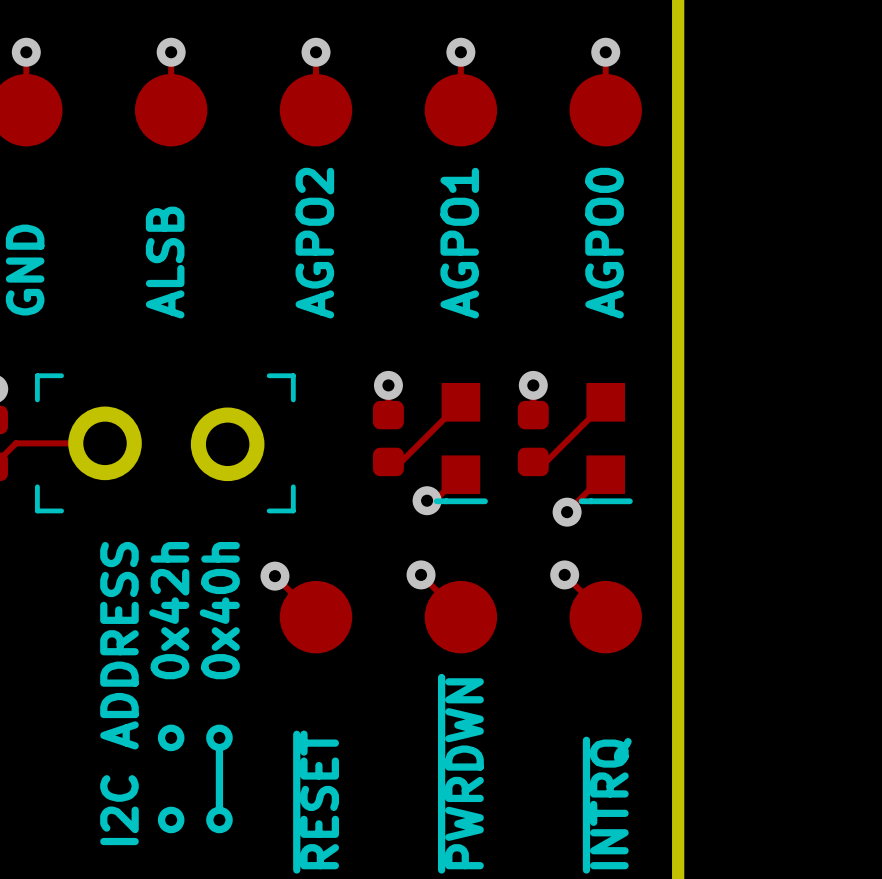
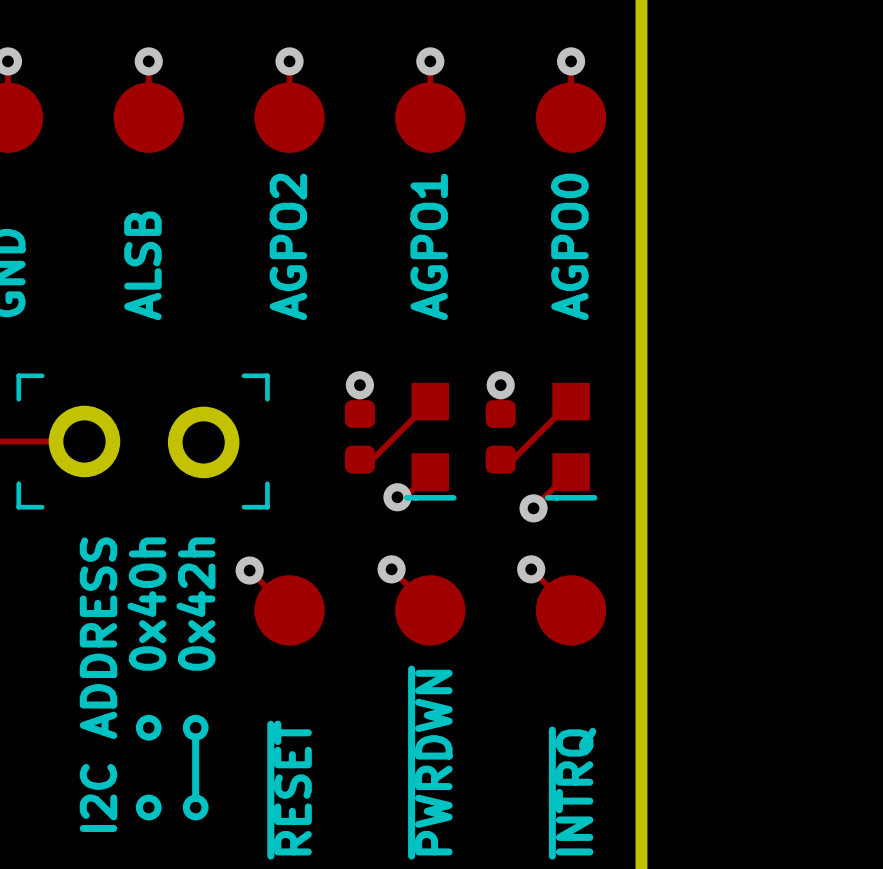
text: 0x42h (169, 610) -> 0x40h (146, 604)
text: 0x40h (219, 610) -> 0x42h (195, 604)

